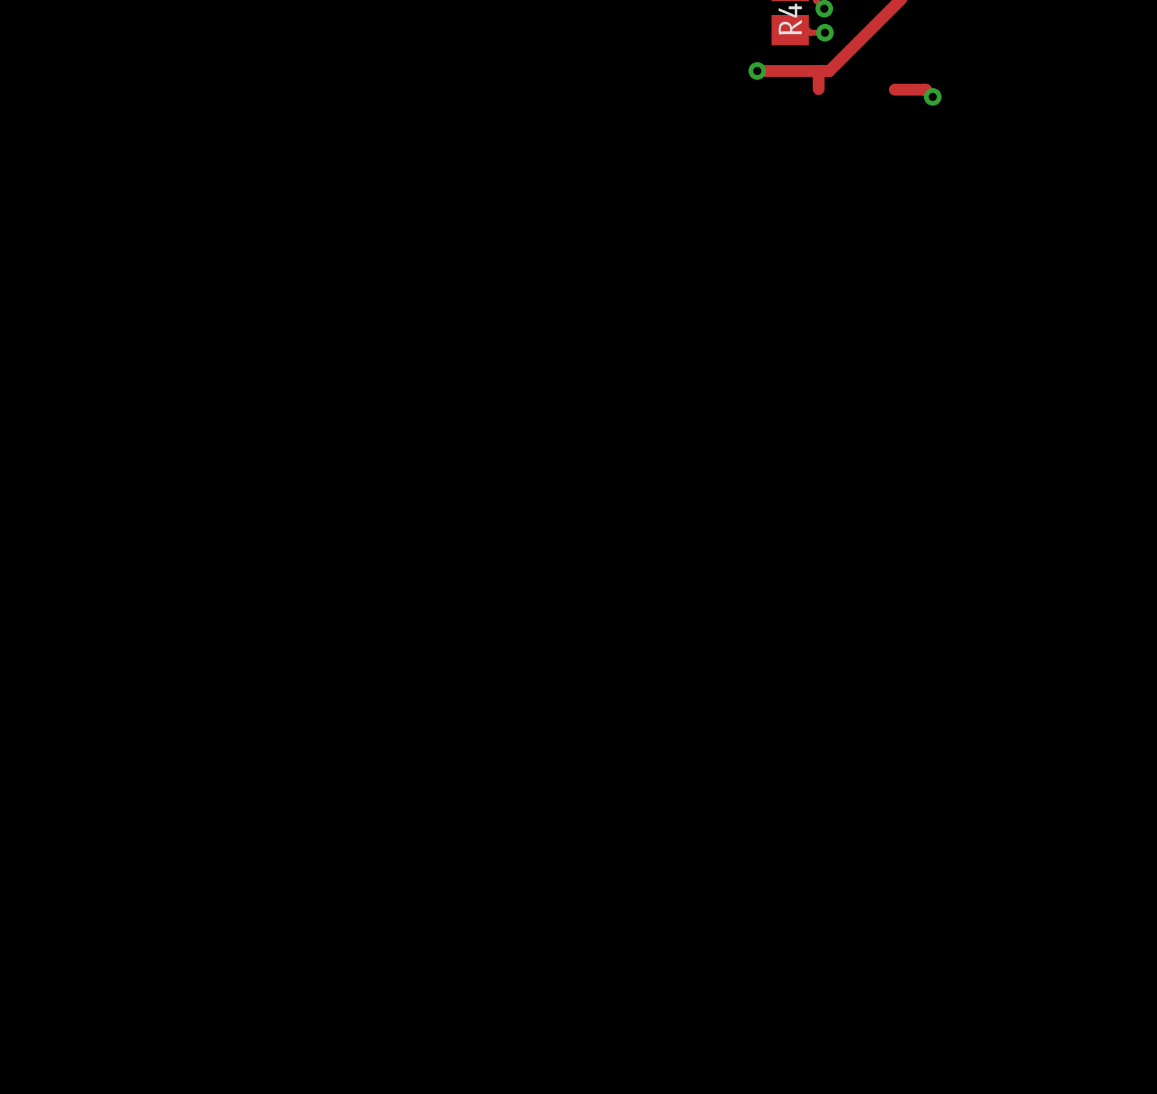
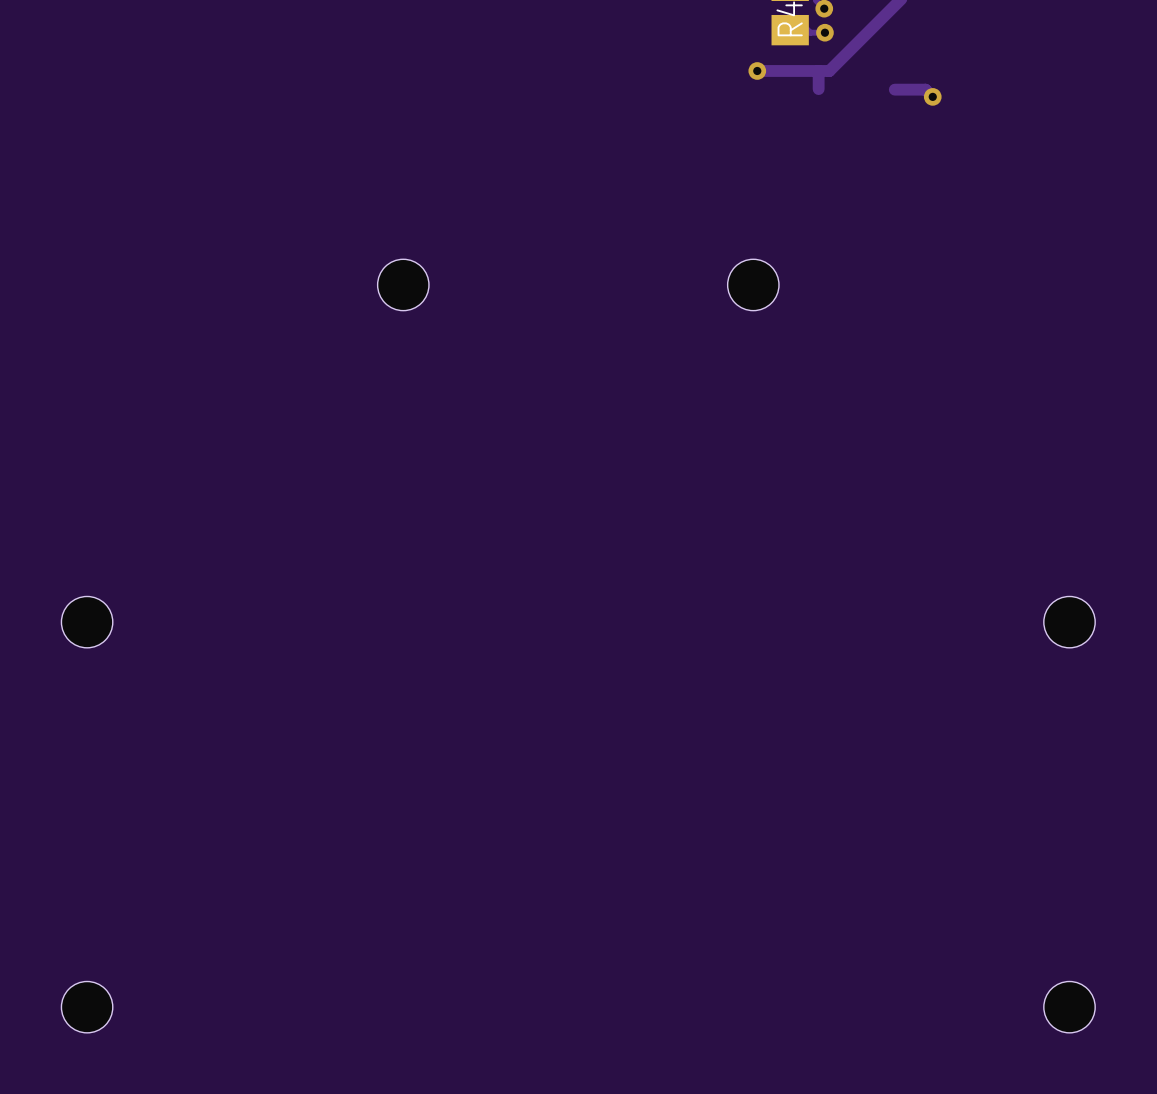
hole: none -> (403, 284)
hole: none -> (753, 284)
hole: none -> (87, 622)
hole: none -> (1069, 622)
hole: none -> (87, 1007)
hole: none -> (1069, 1007)

